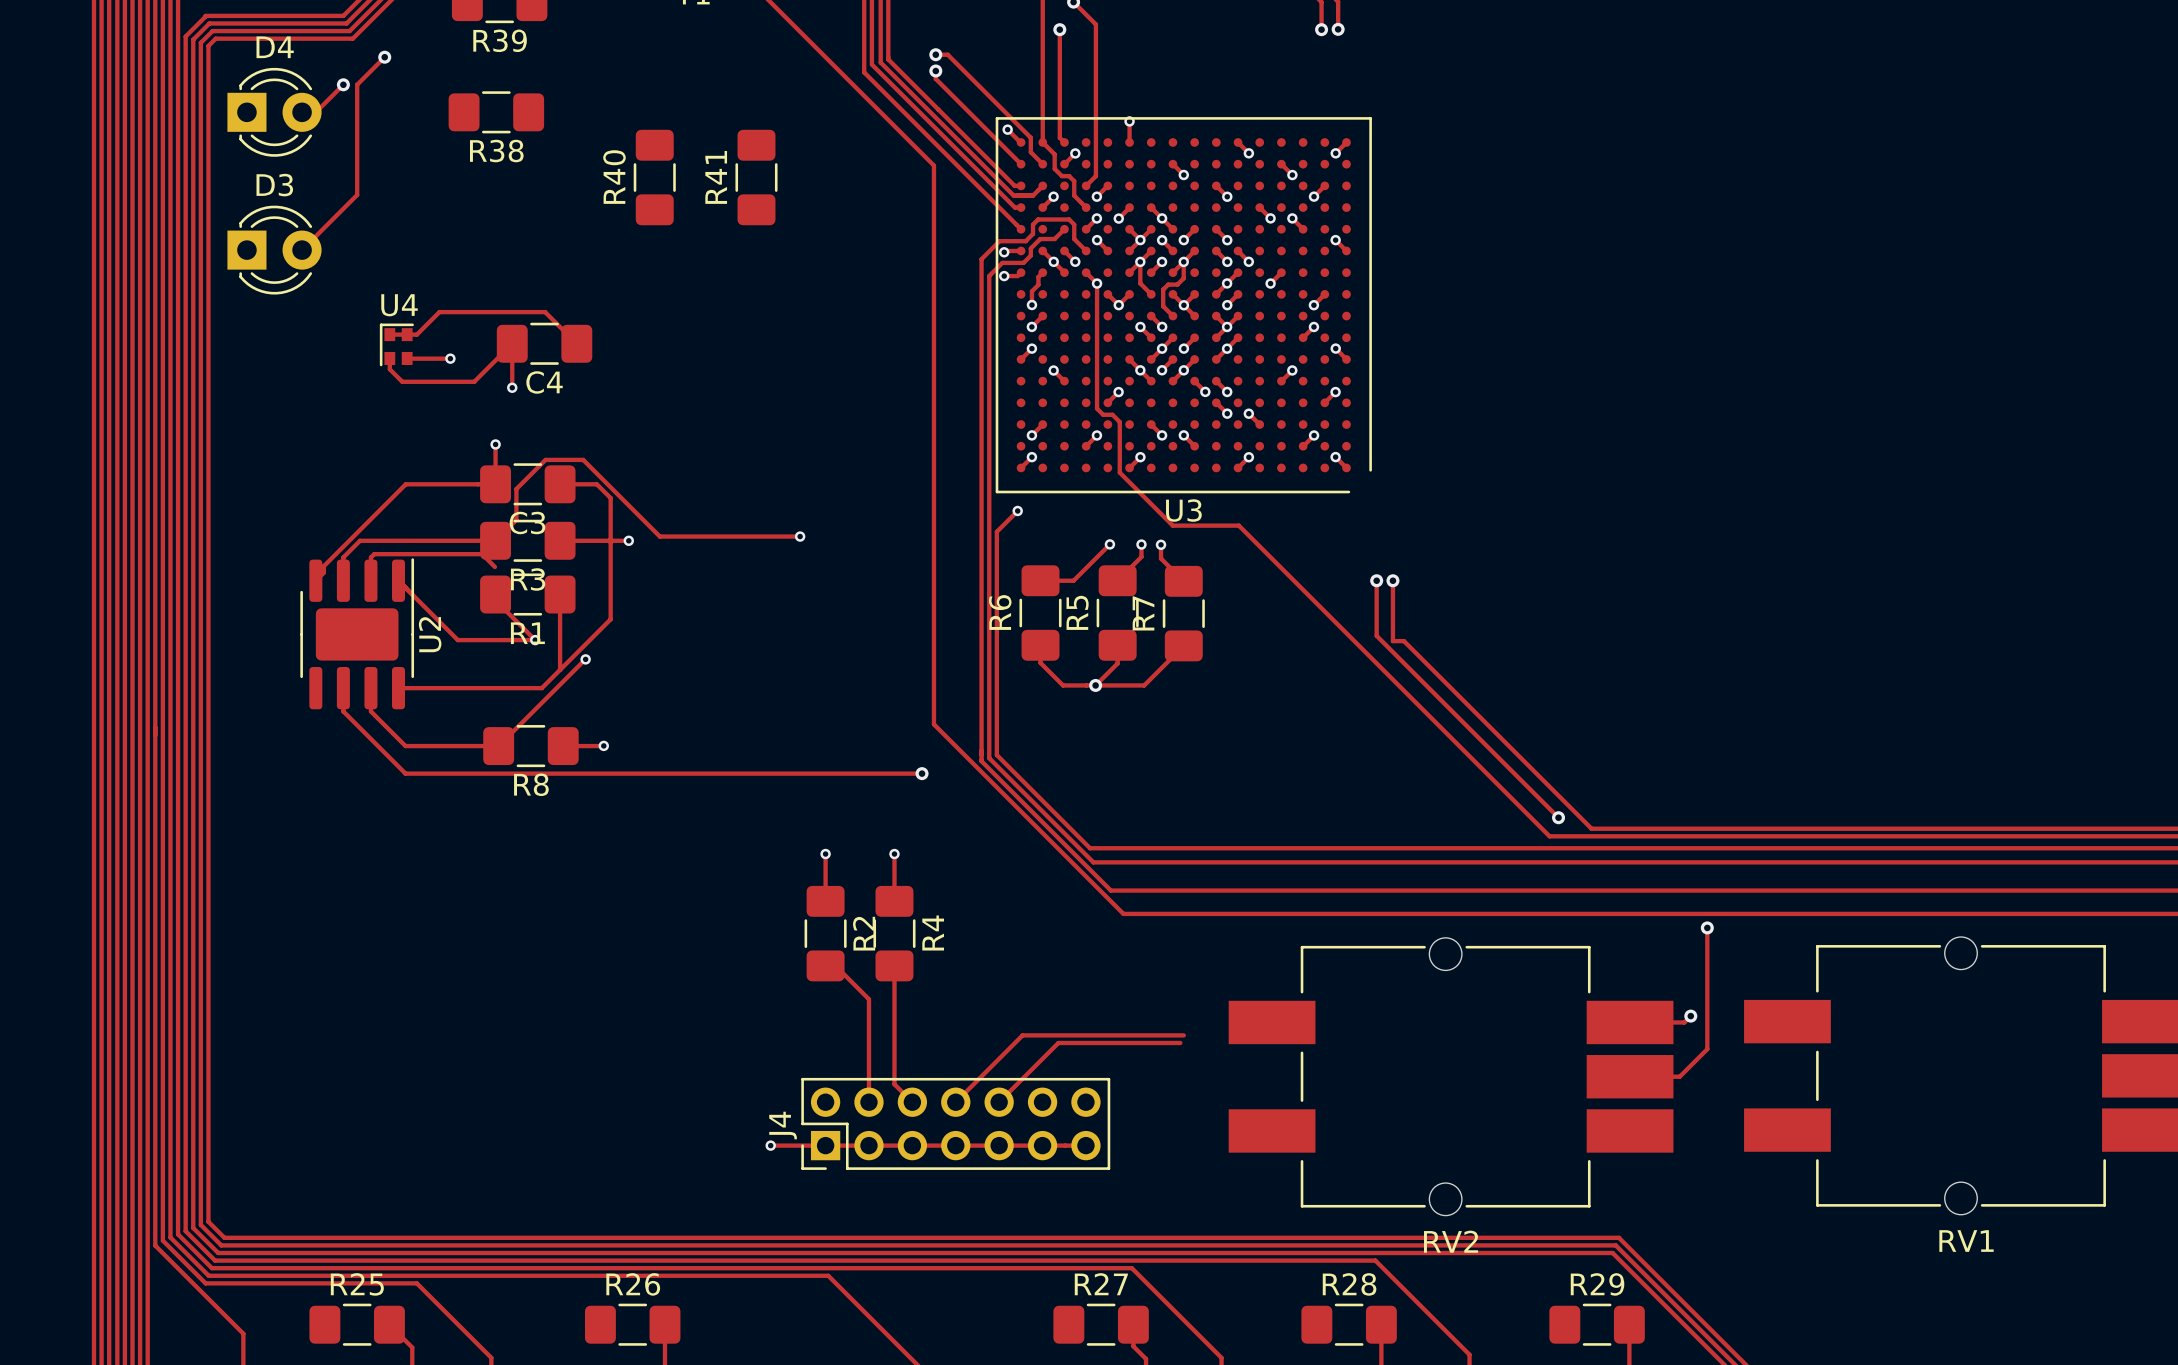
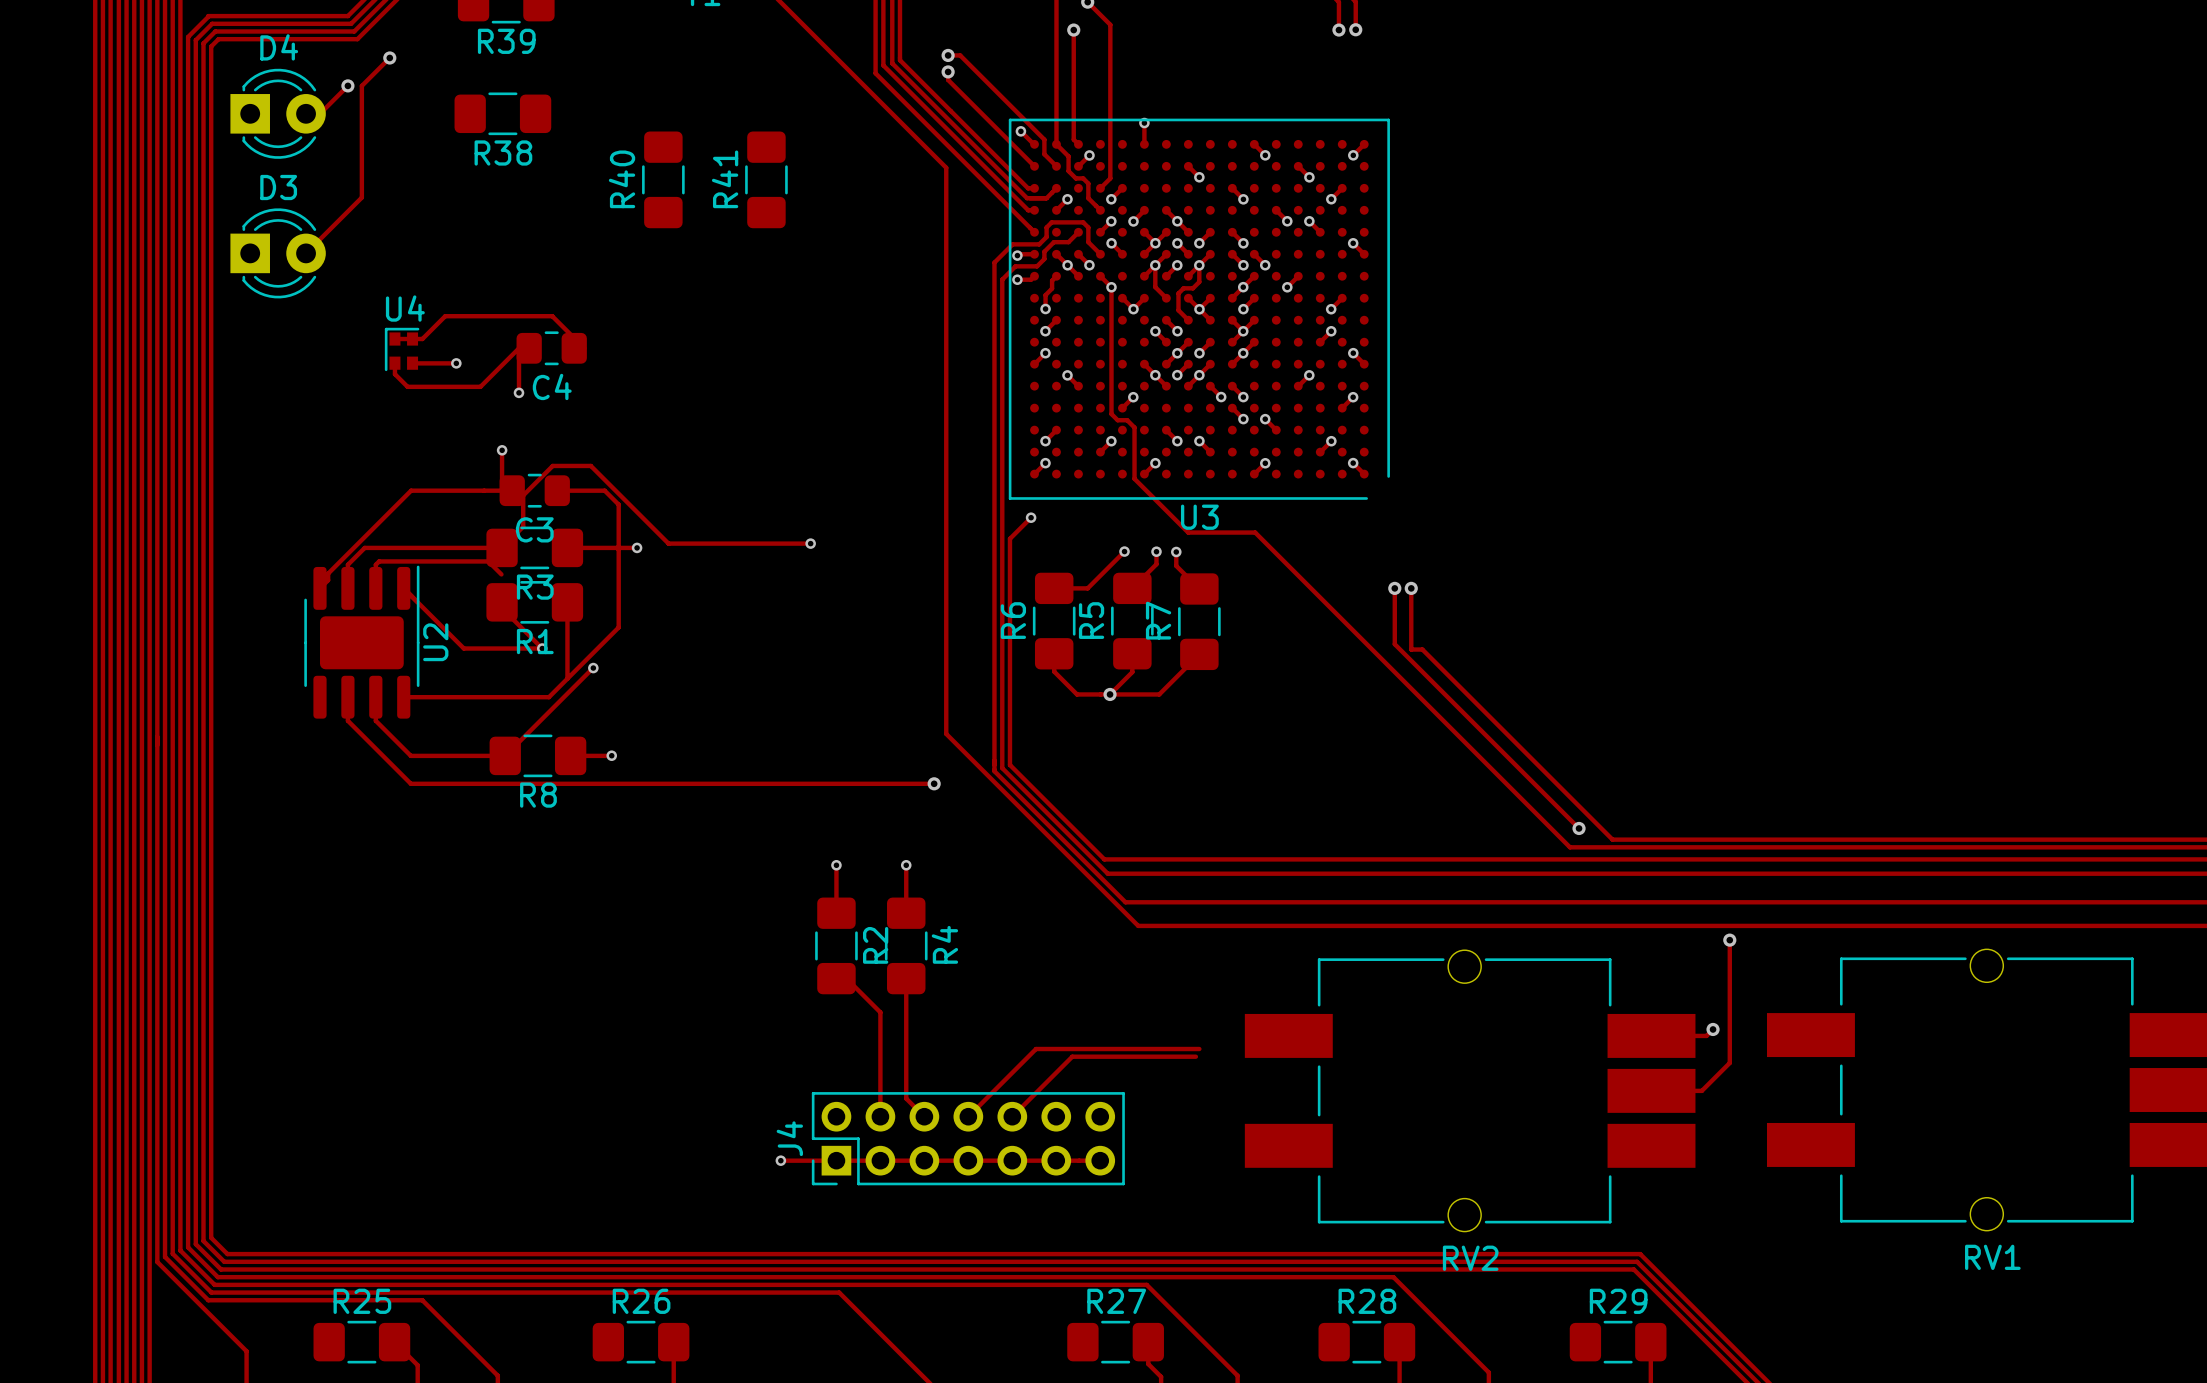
C4 footprint: [496, 322, 593, 365] -> [516, 331, 587, 366]
C3 footprint: [480, 463, 576, 506] -> [499, 473, 570, 508]

